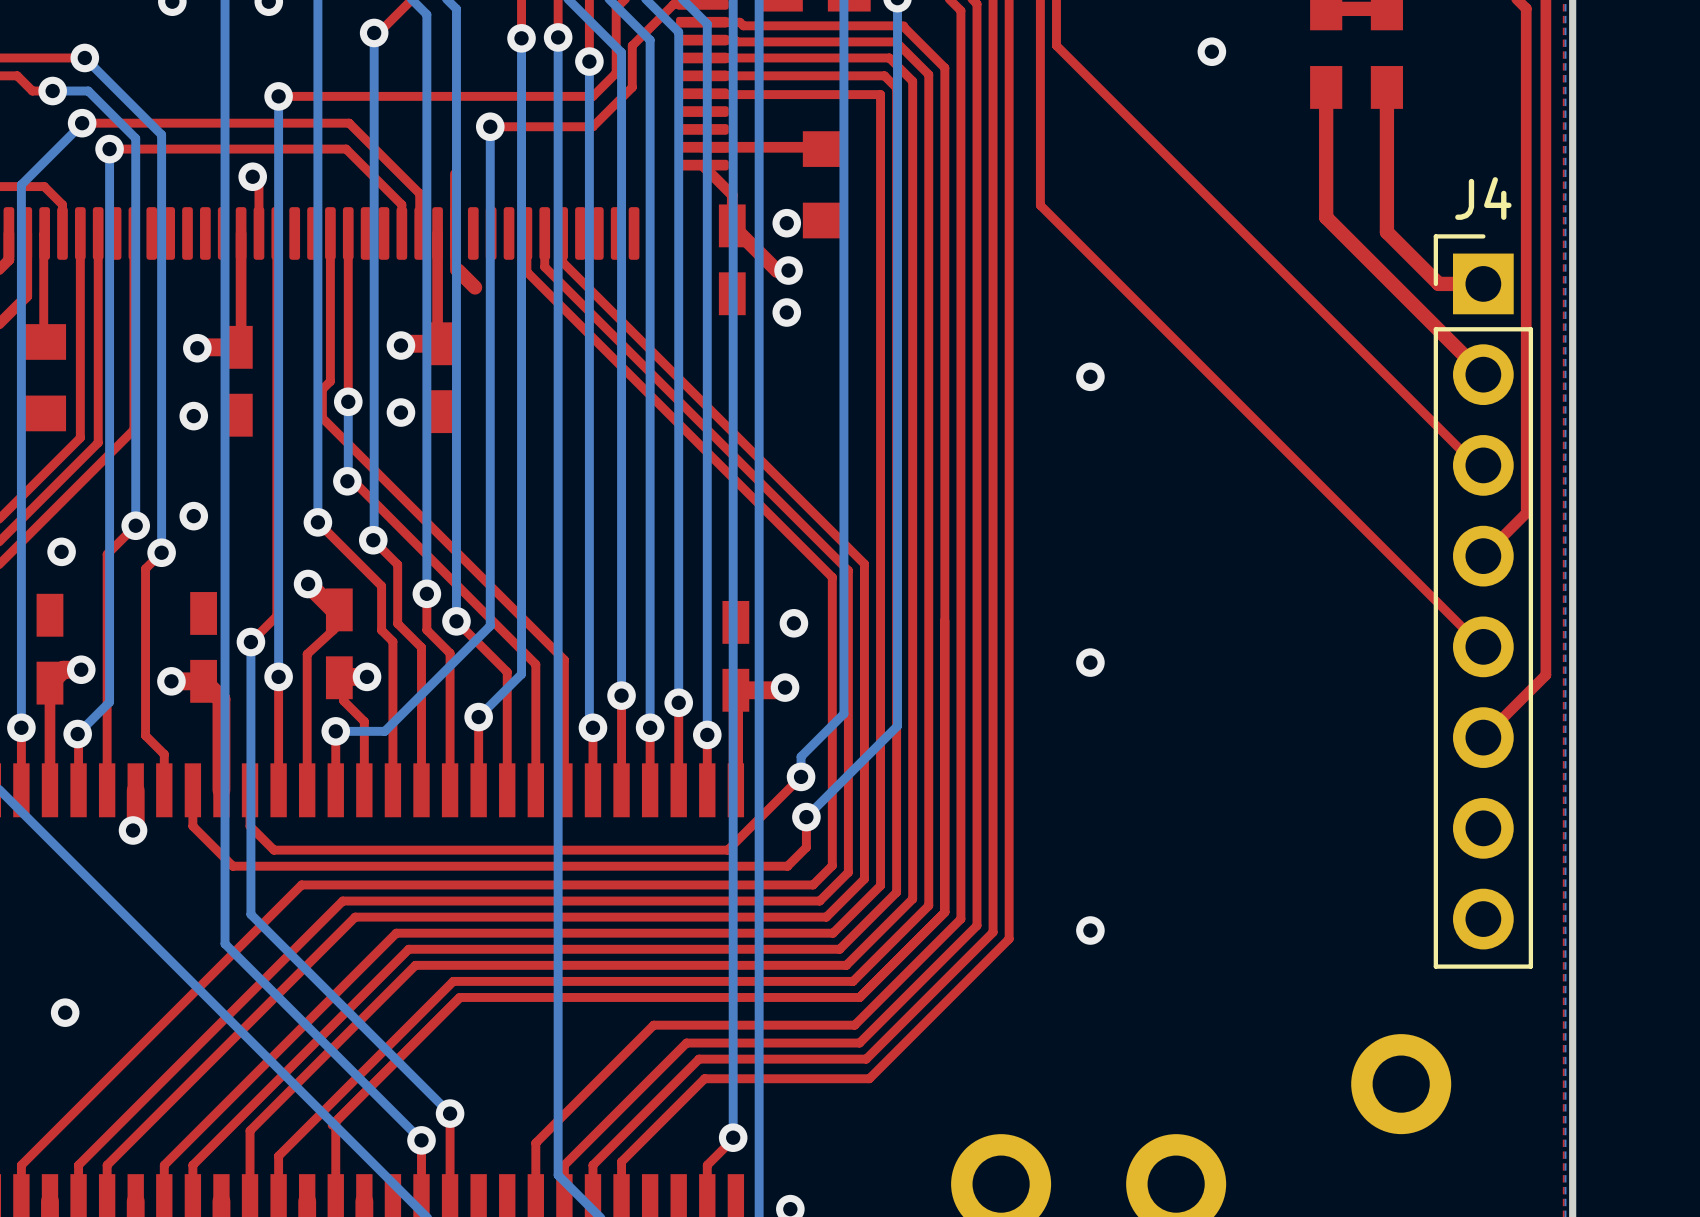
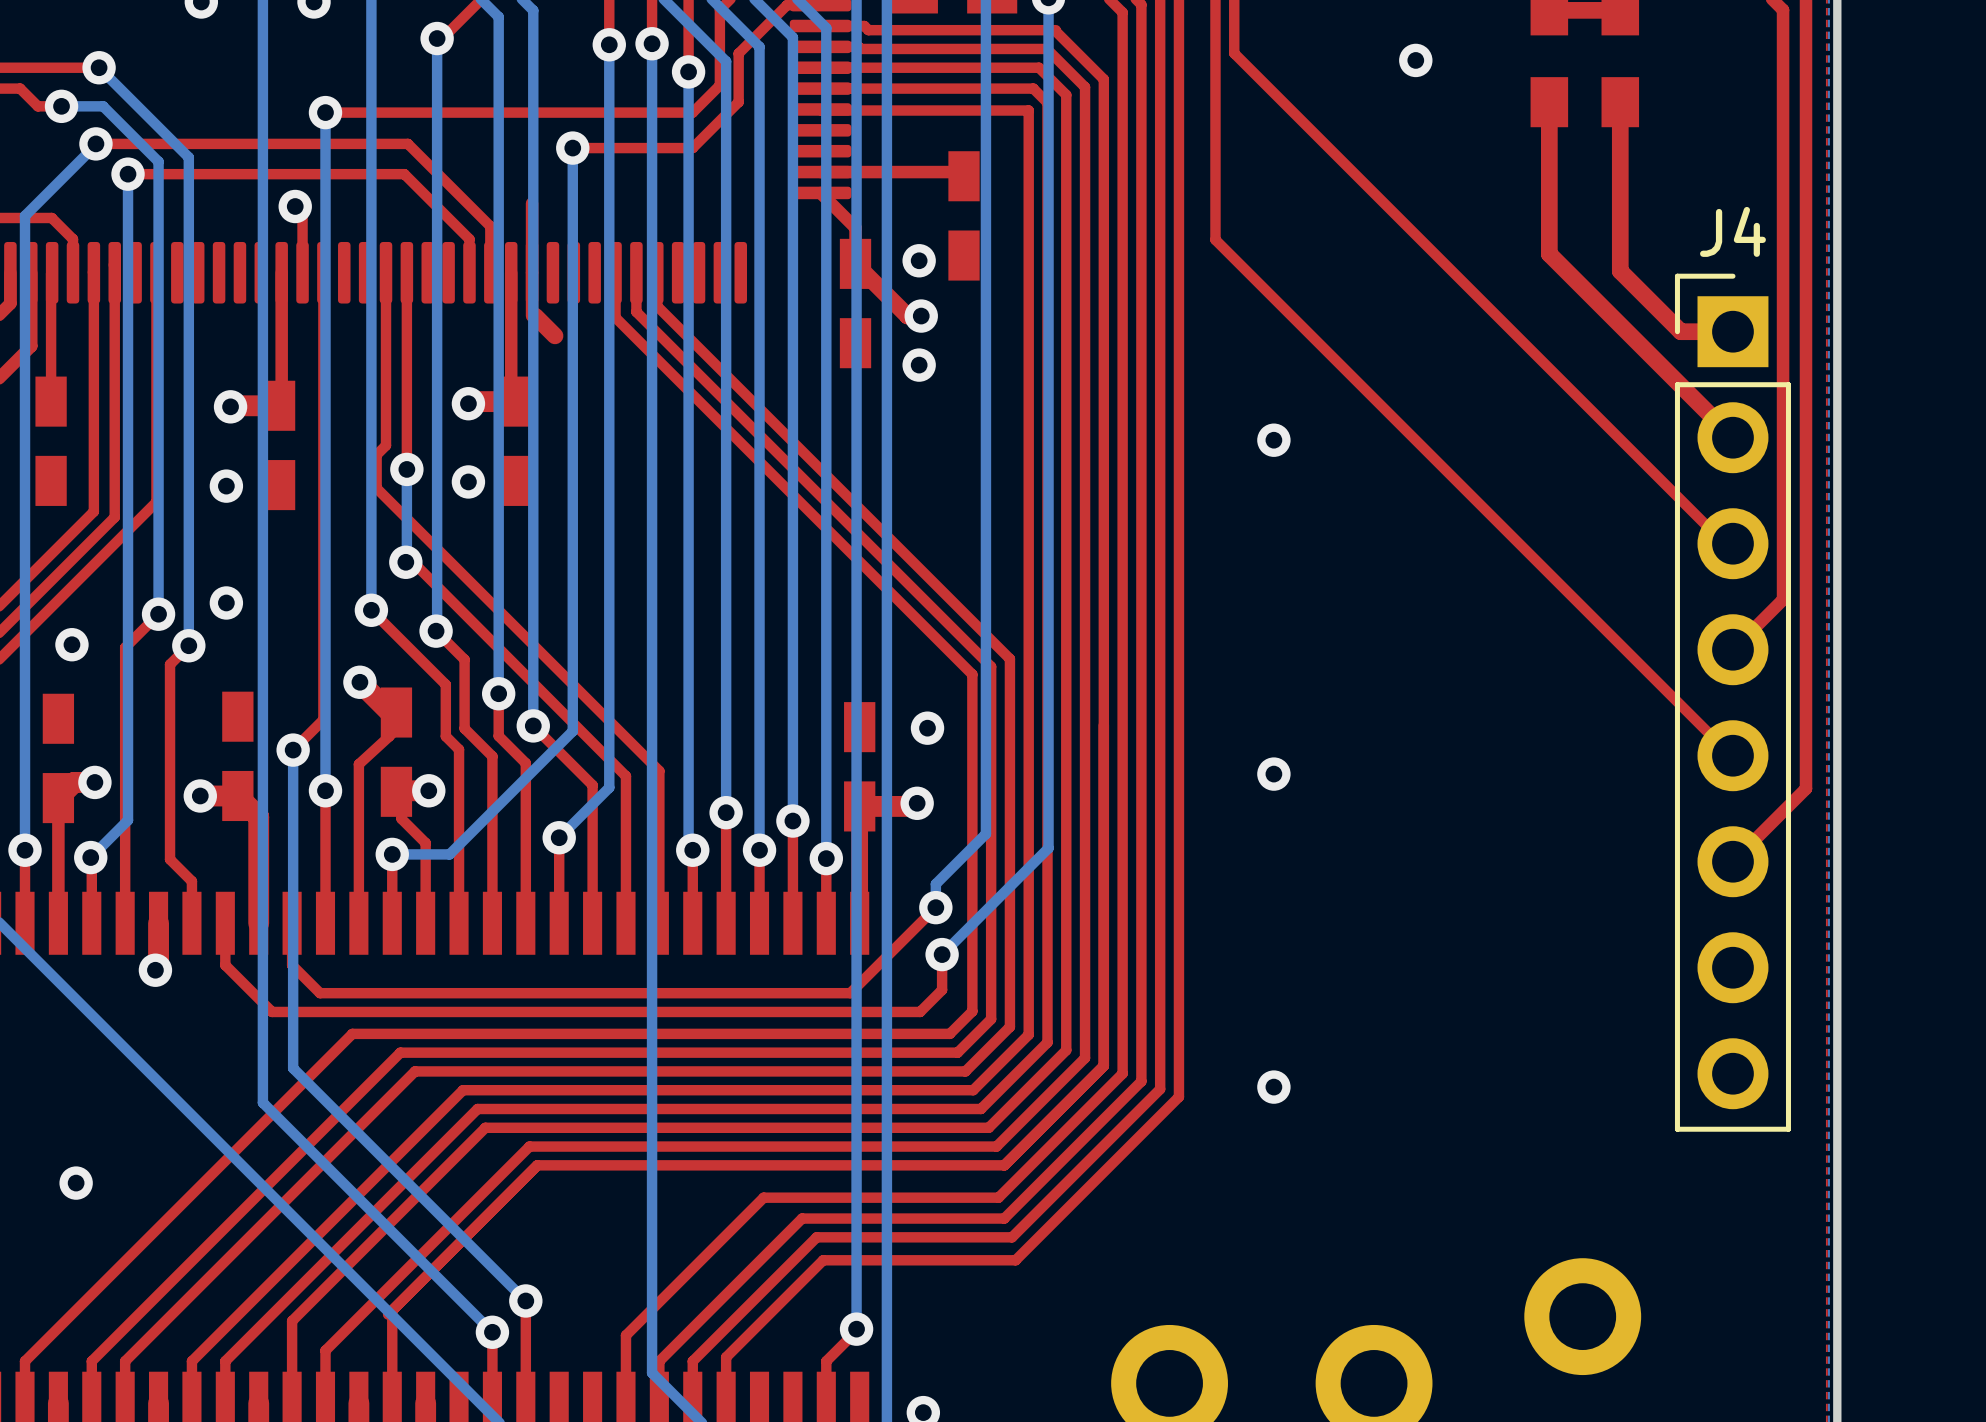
part footprint: [802, 131, 848, 239] -> [948, 151, 980, 281]
part footprint: [21, 324, 67, 432] -> [35, 376, 67, 506]
part position: (1401, 1084) -> (1582, 1316)

